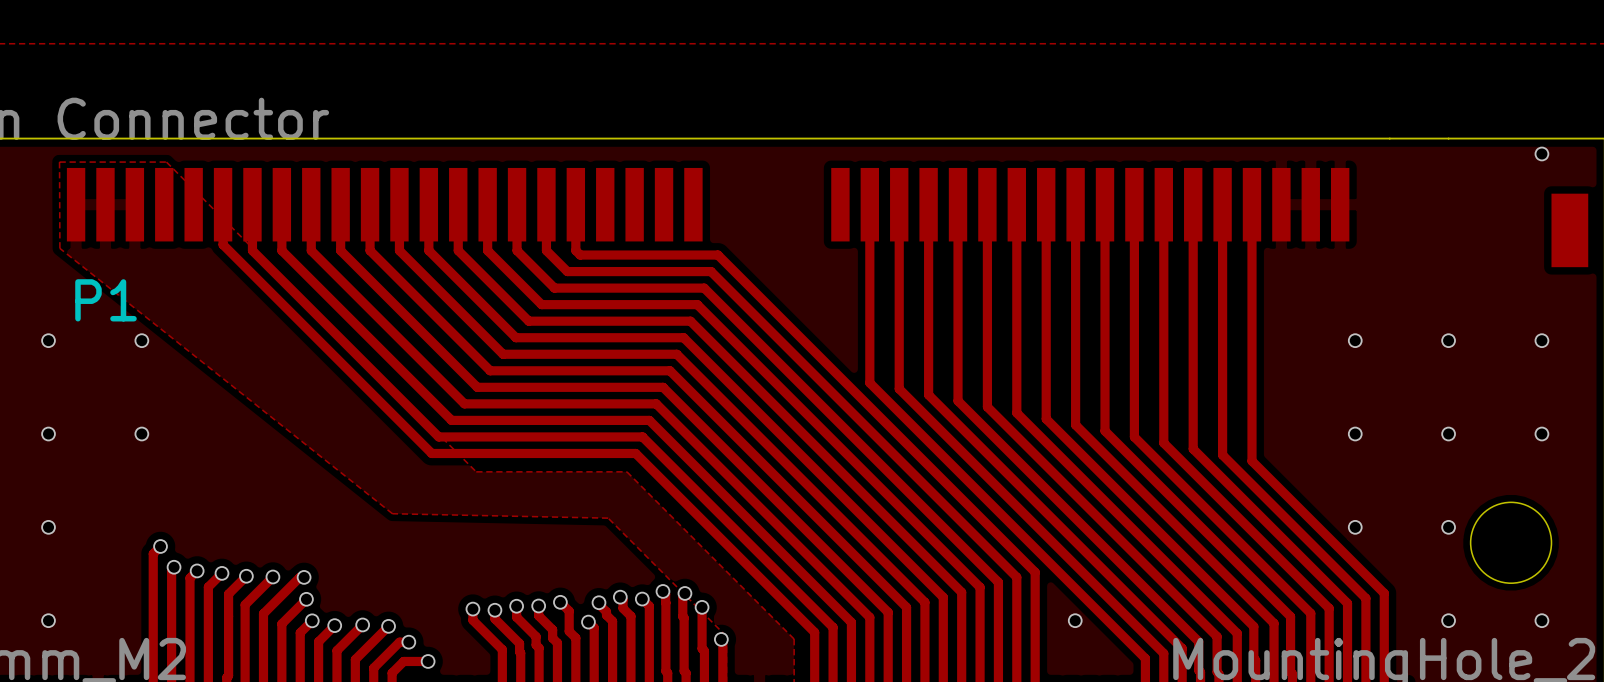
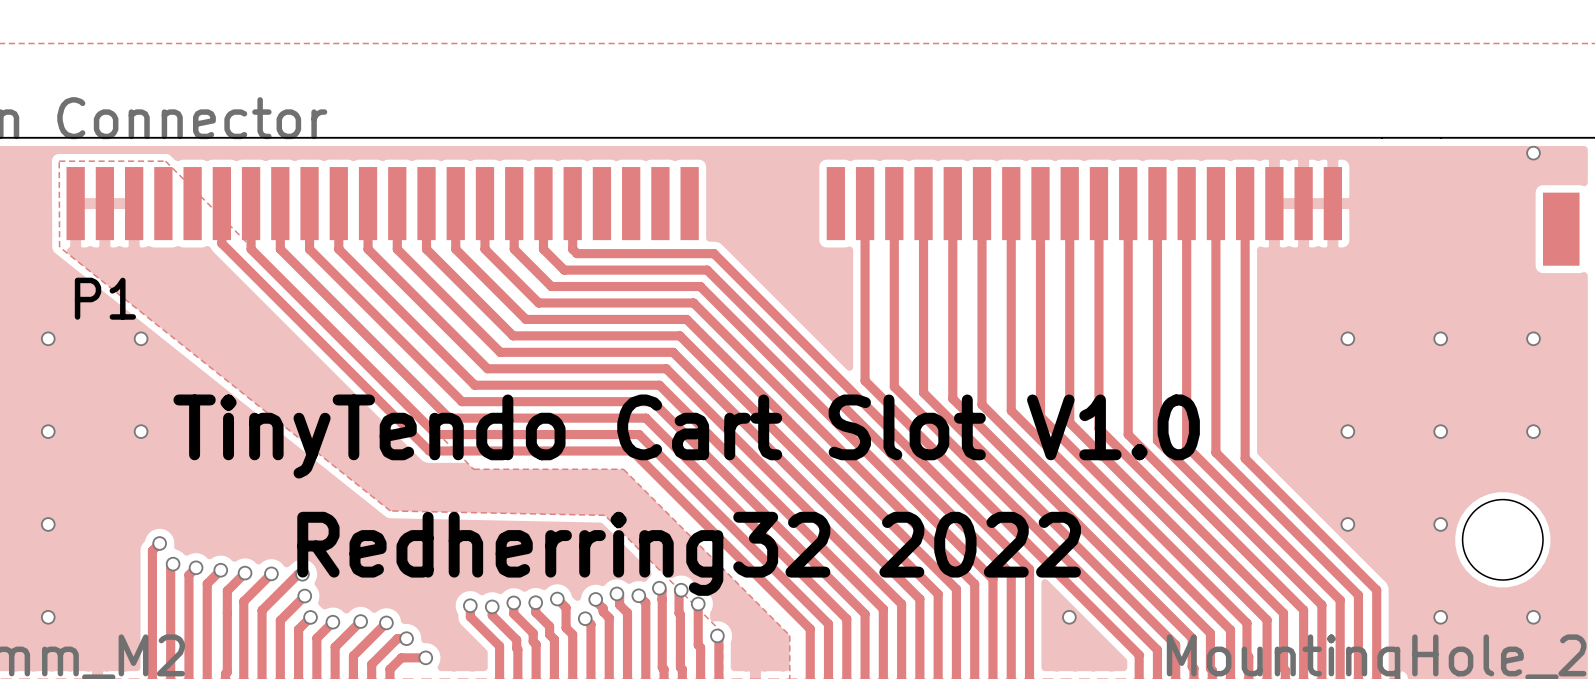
text: none -> TinyTendo Cart Slot V1.0 (686, 436)
text: none -> Redherring32 2022 (689, 553)

